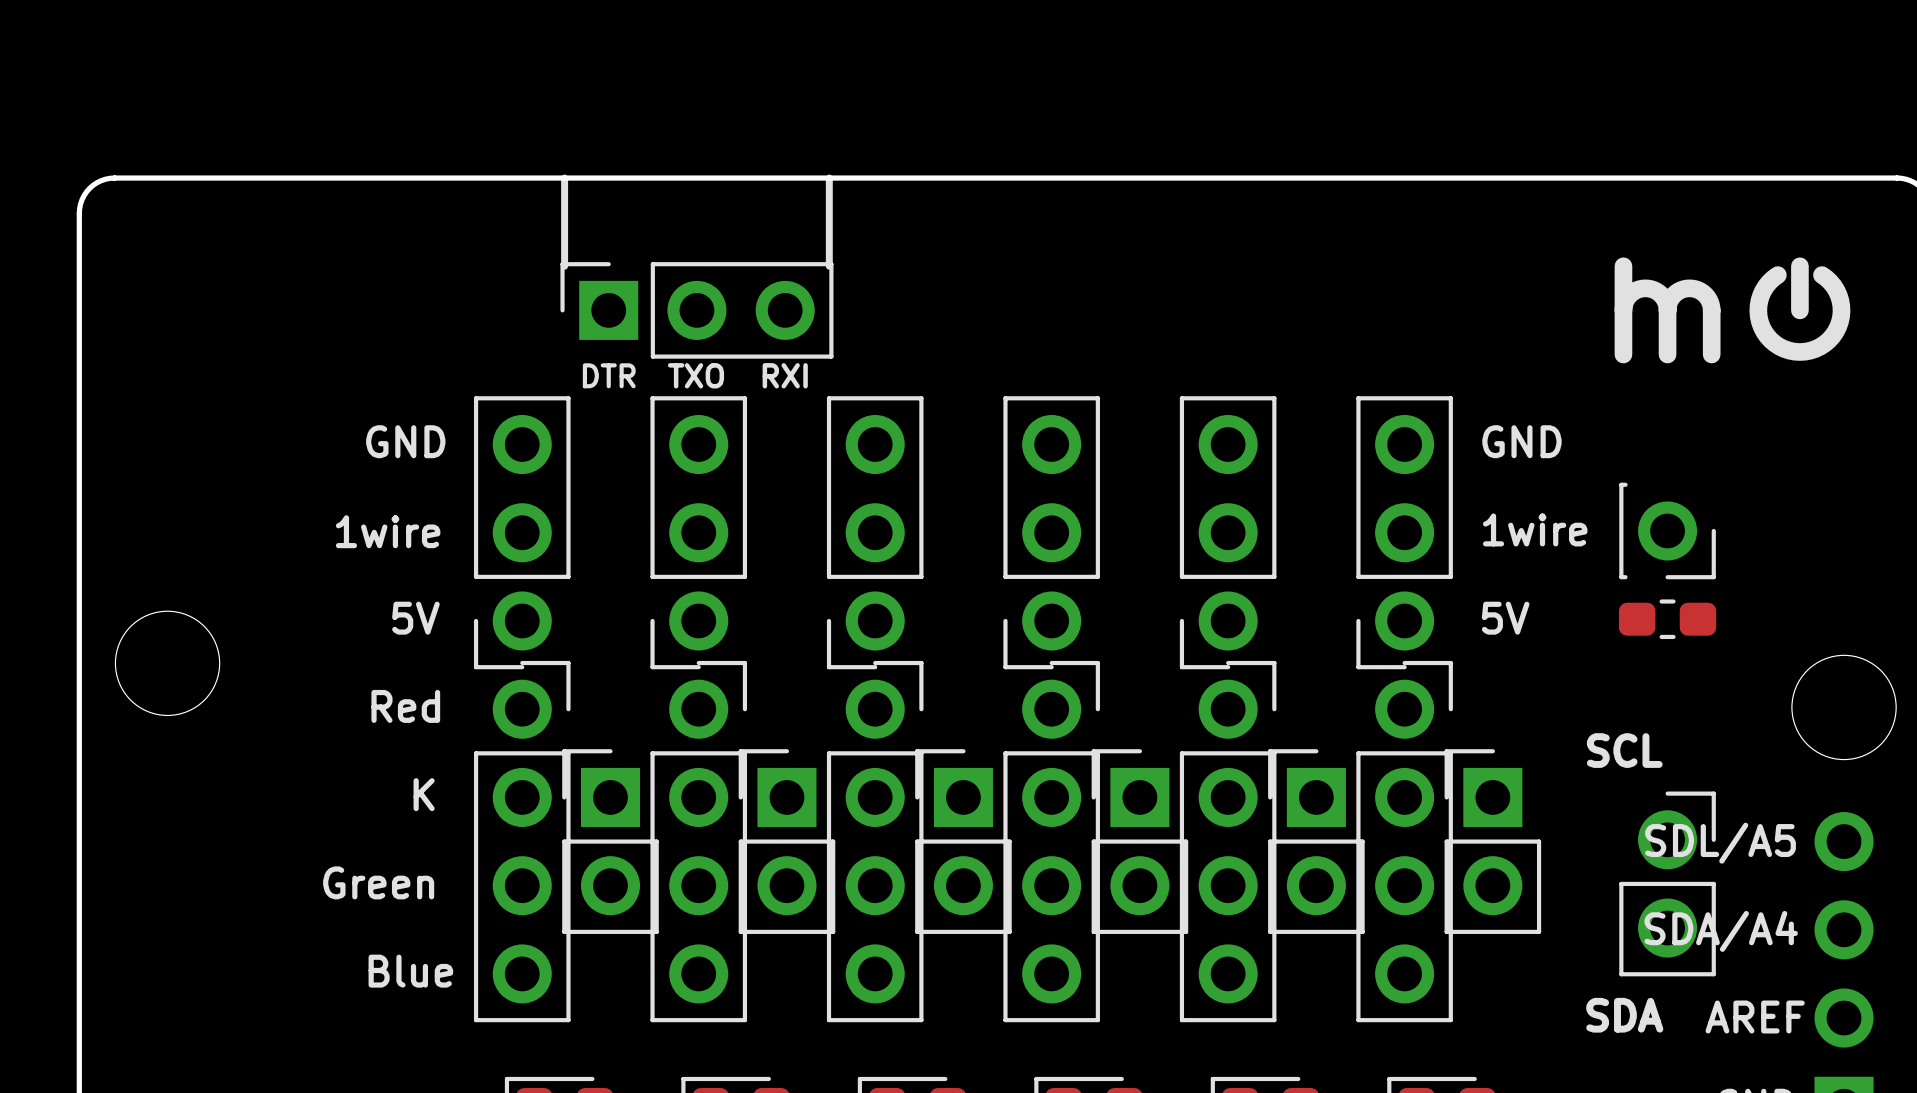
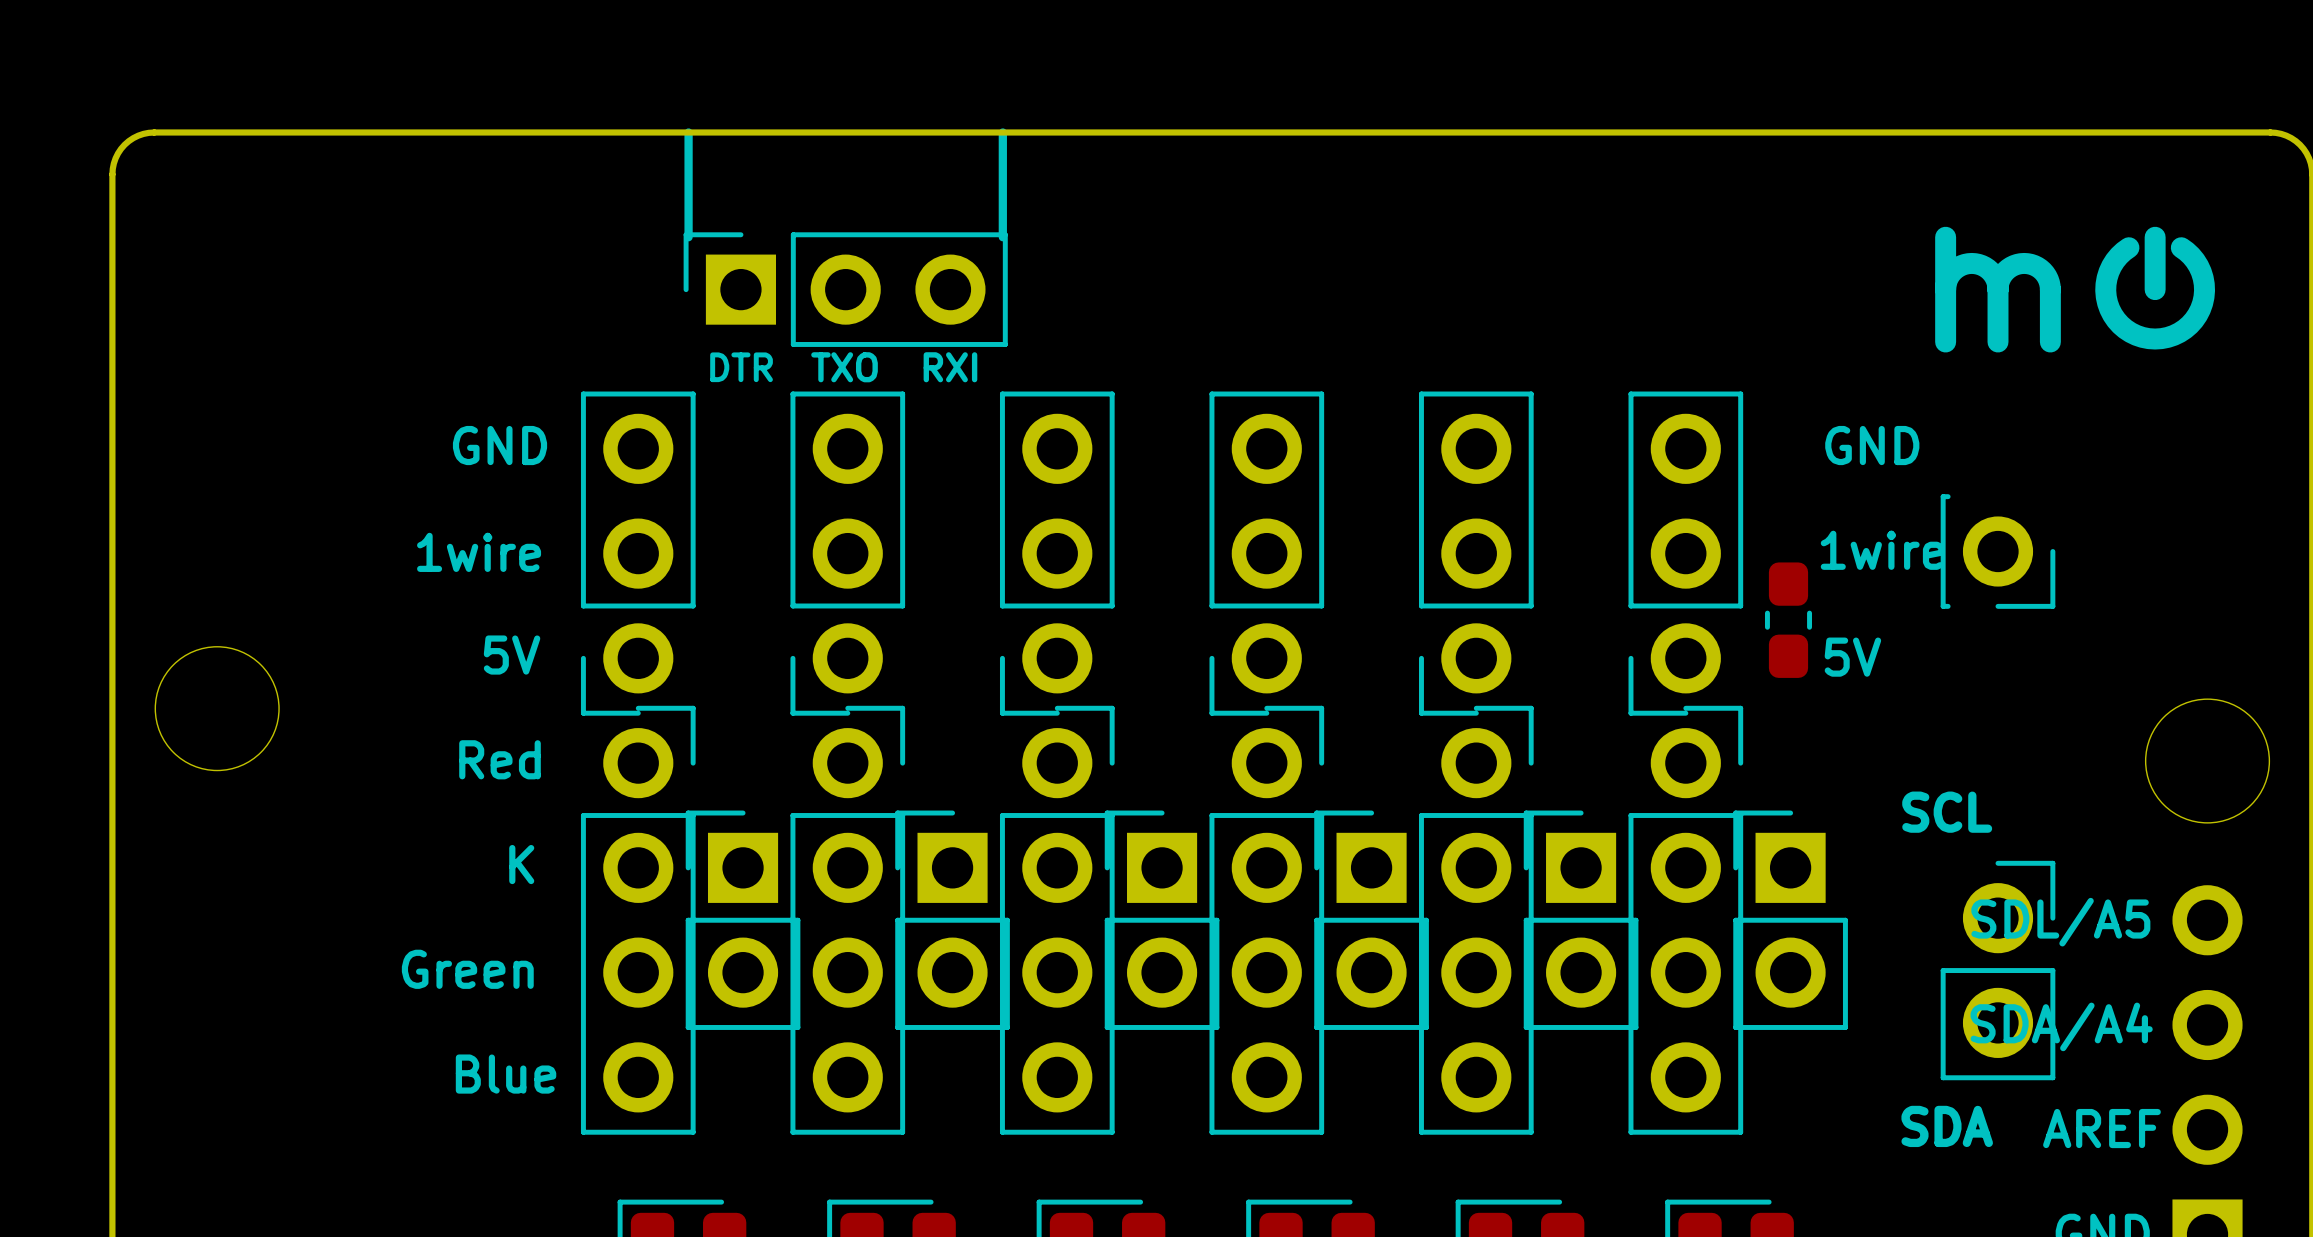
text position: GND (1521, 441) -> GND (1872, 445)
text position: 1wire (1535, 529) -> 1wire (1882, 550)
text position: 5V (1505, 618) -> 5V (1852, 657)
part rotation: 0° (1667, 619) -> 90° clockwise (1788, 620)
part position: (1667, 619) -> (1788, 620)

